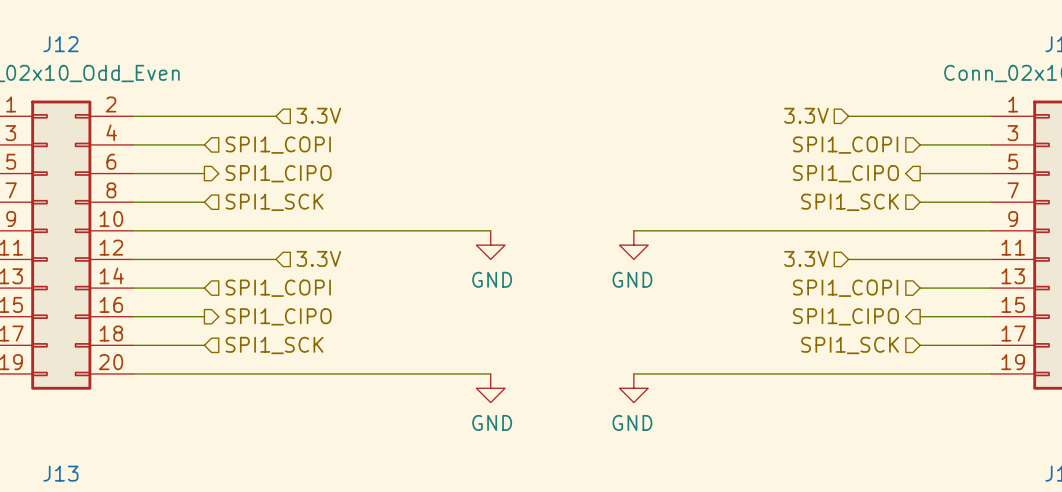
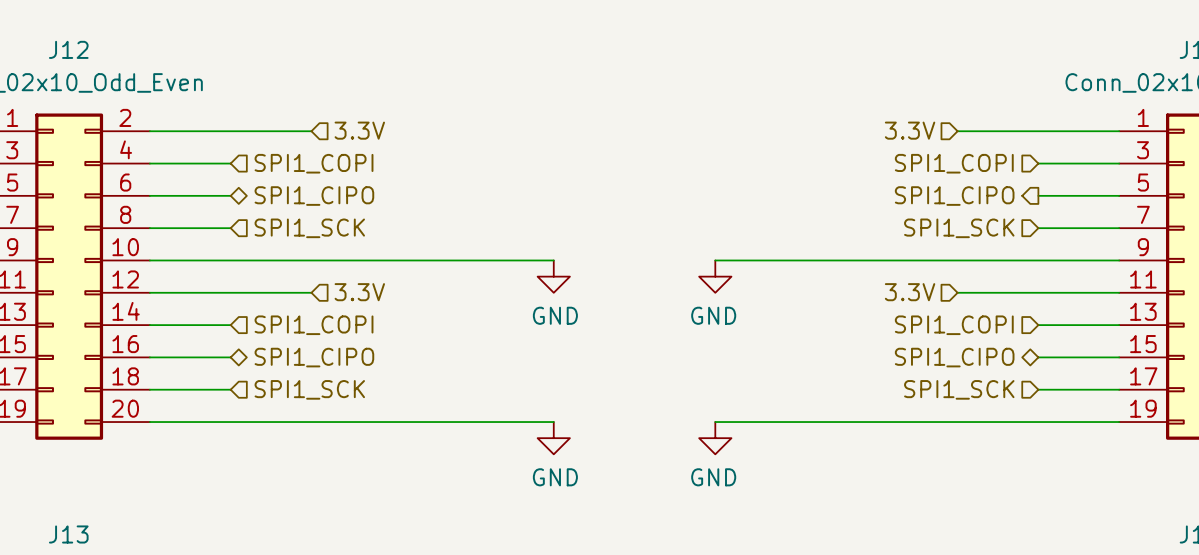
hierarchical label shape: output (278, 173) -> bidirectional (314, 196)
hierarchical label shape: output (278, 316) -> bidirectional (314, 357)
hierarchical label shape: output (845, 316) -> bidirectional (954, 357)

